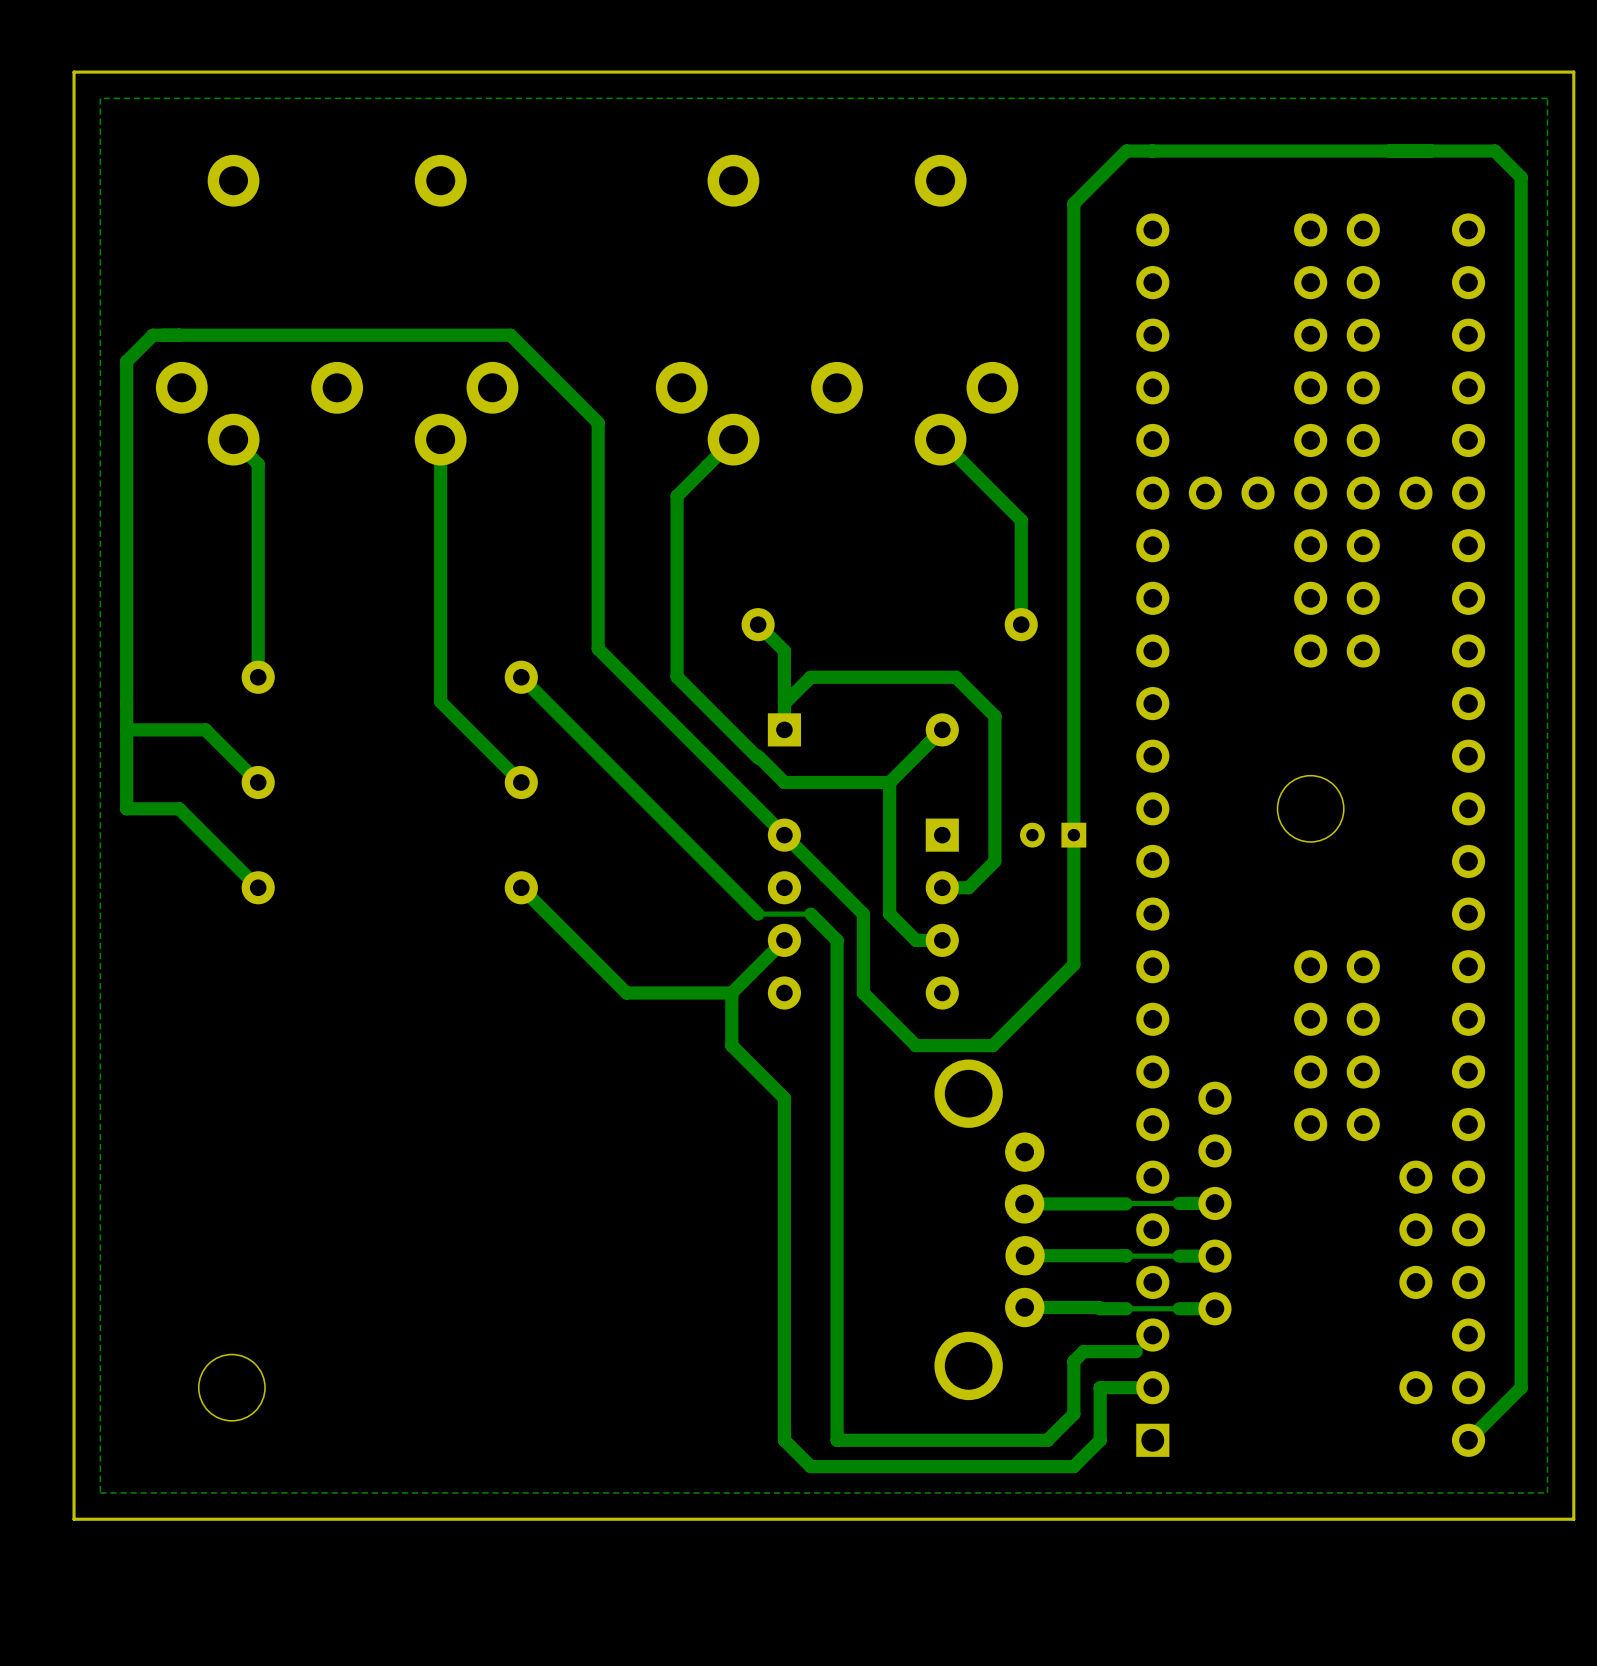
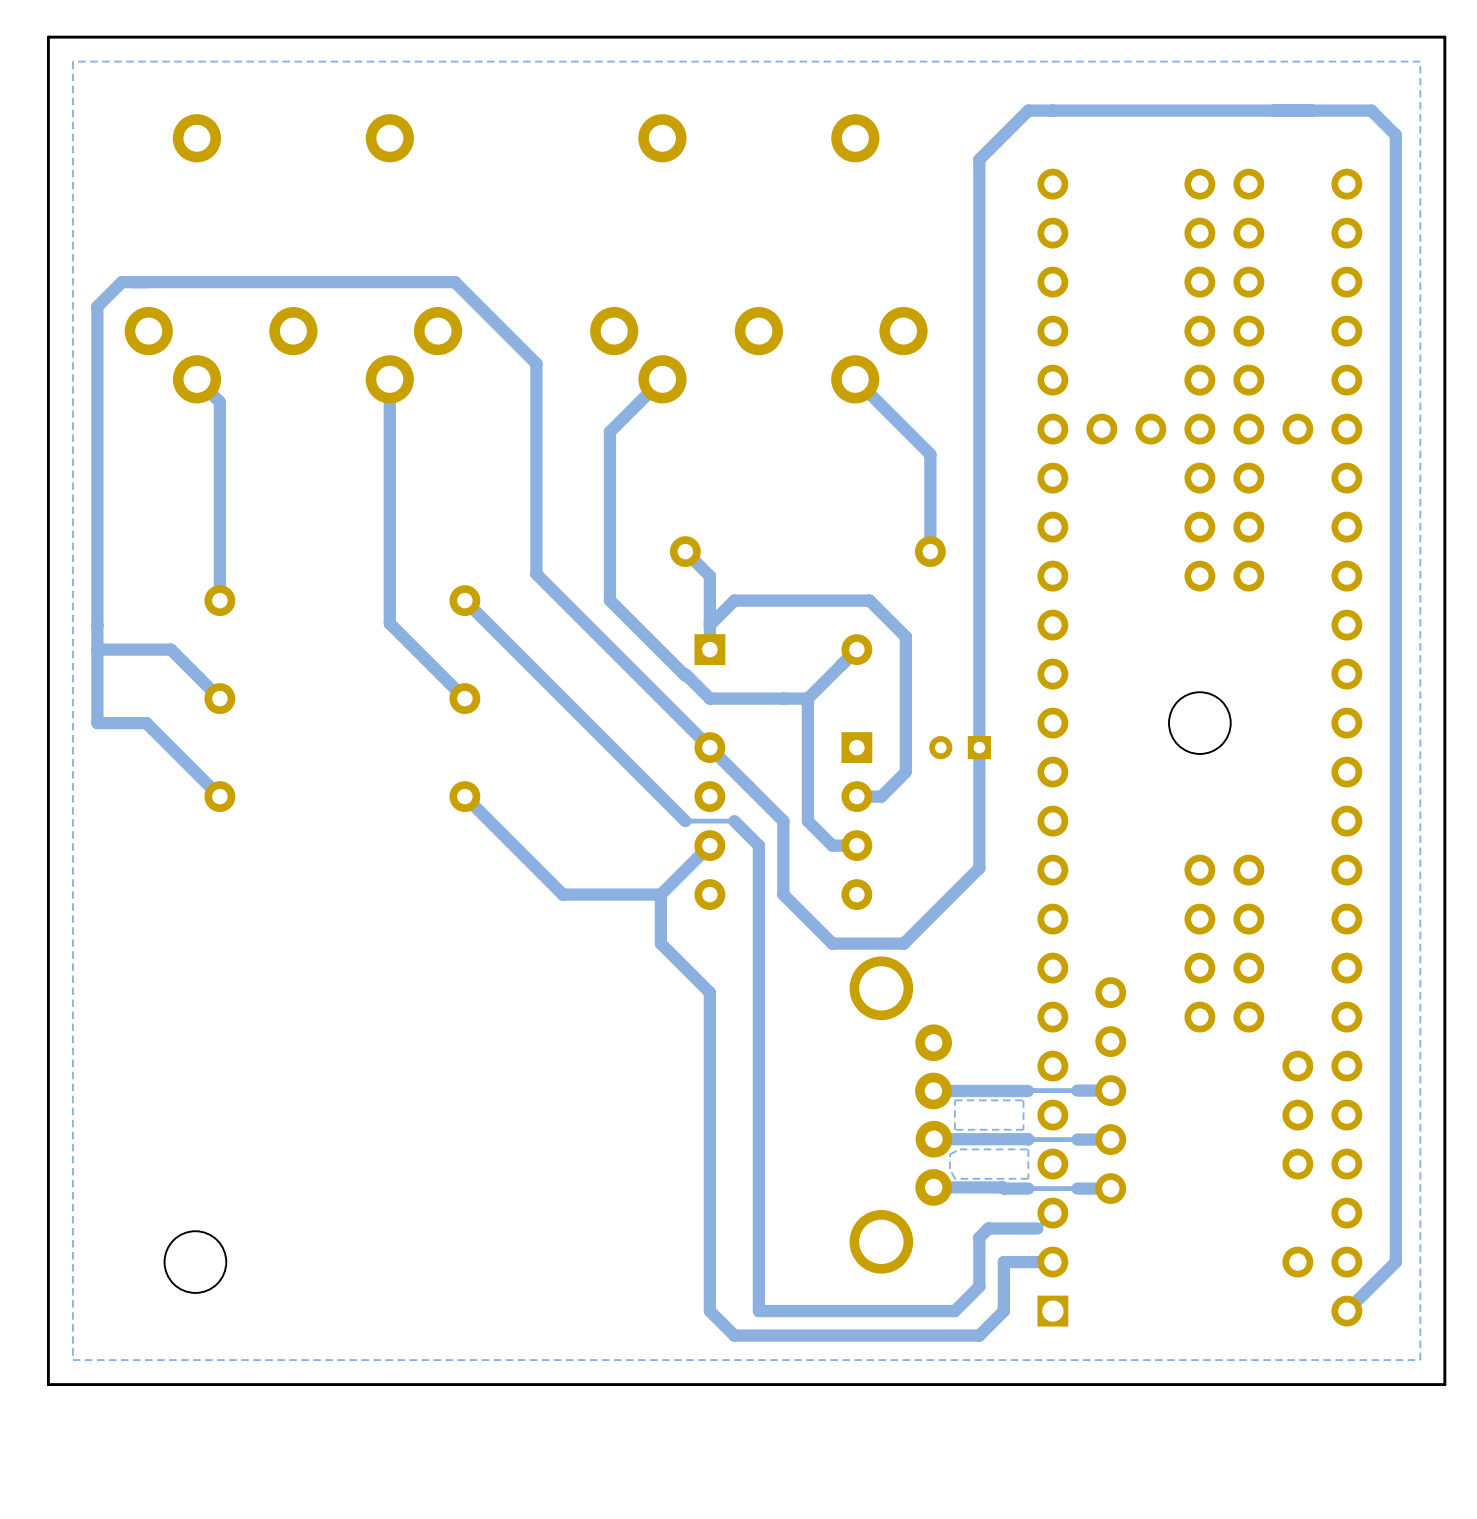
zone outline: none -> (1023, 1100) (1023, 1129) (954, 1129) (954, 1100) (1023, 1100)
zone outline: none -> (1028, 1149) (1028, 1178) (954, 1178) (949, 1168) (949, 1154) (959, 1149) (1028, 1149)

